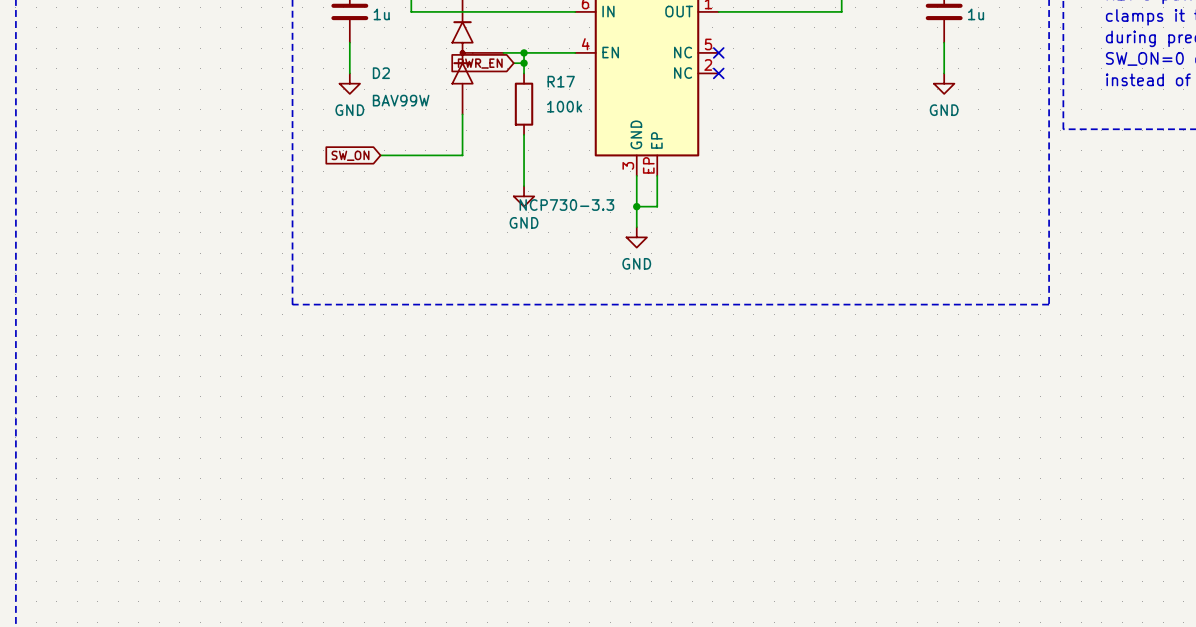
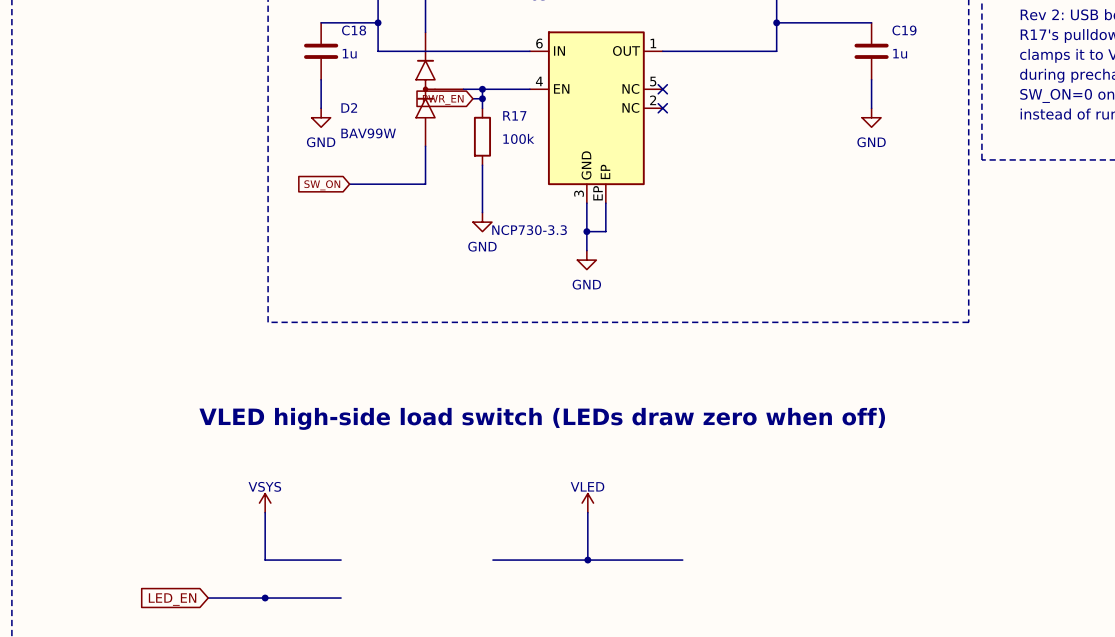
text: none -> VLED high-side load switch (LEDs draw zero when off) (542, 418)
power symbol: none -> VSYS (265, 503)
power symbol: none -> VLED (587, 503)
wire: none -> (265, 512) (265, 560) (341, 560)
wire: none -> (587, 512) (587, 560)
wire: none -> (492, 560) (682, 560)
junction: none -> (587, 560)
global label: none -> LED_EN (172, 599)
wire: none -> (208, 598) (341, 598)
junction: none -> (265, 598)

